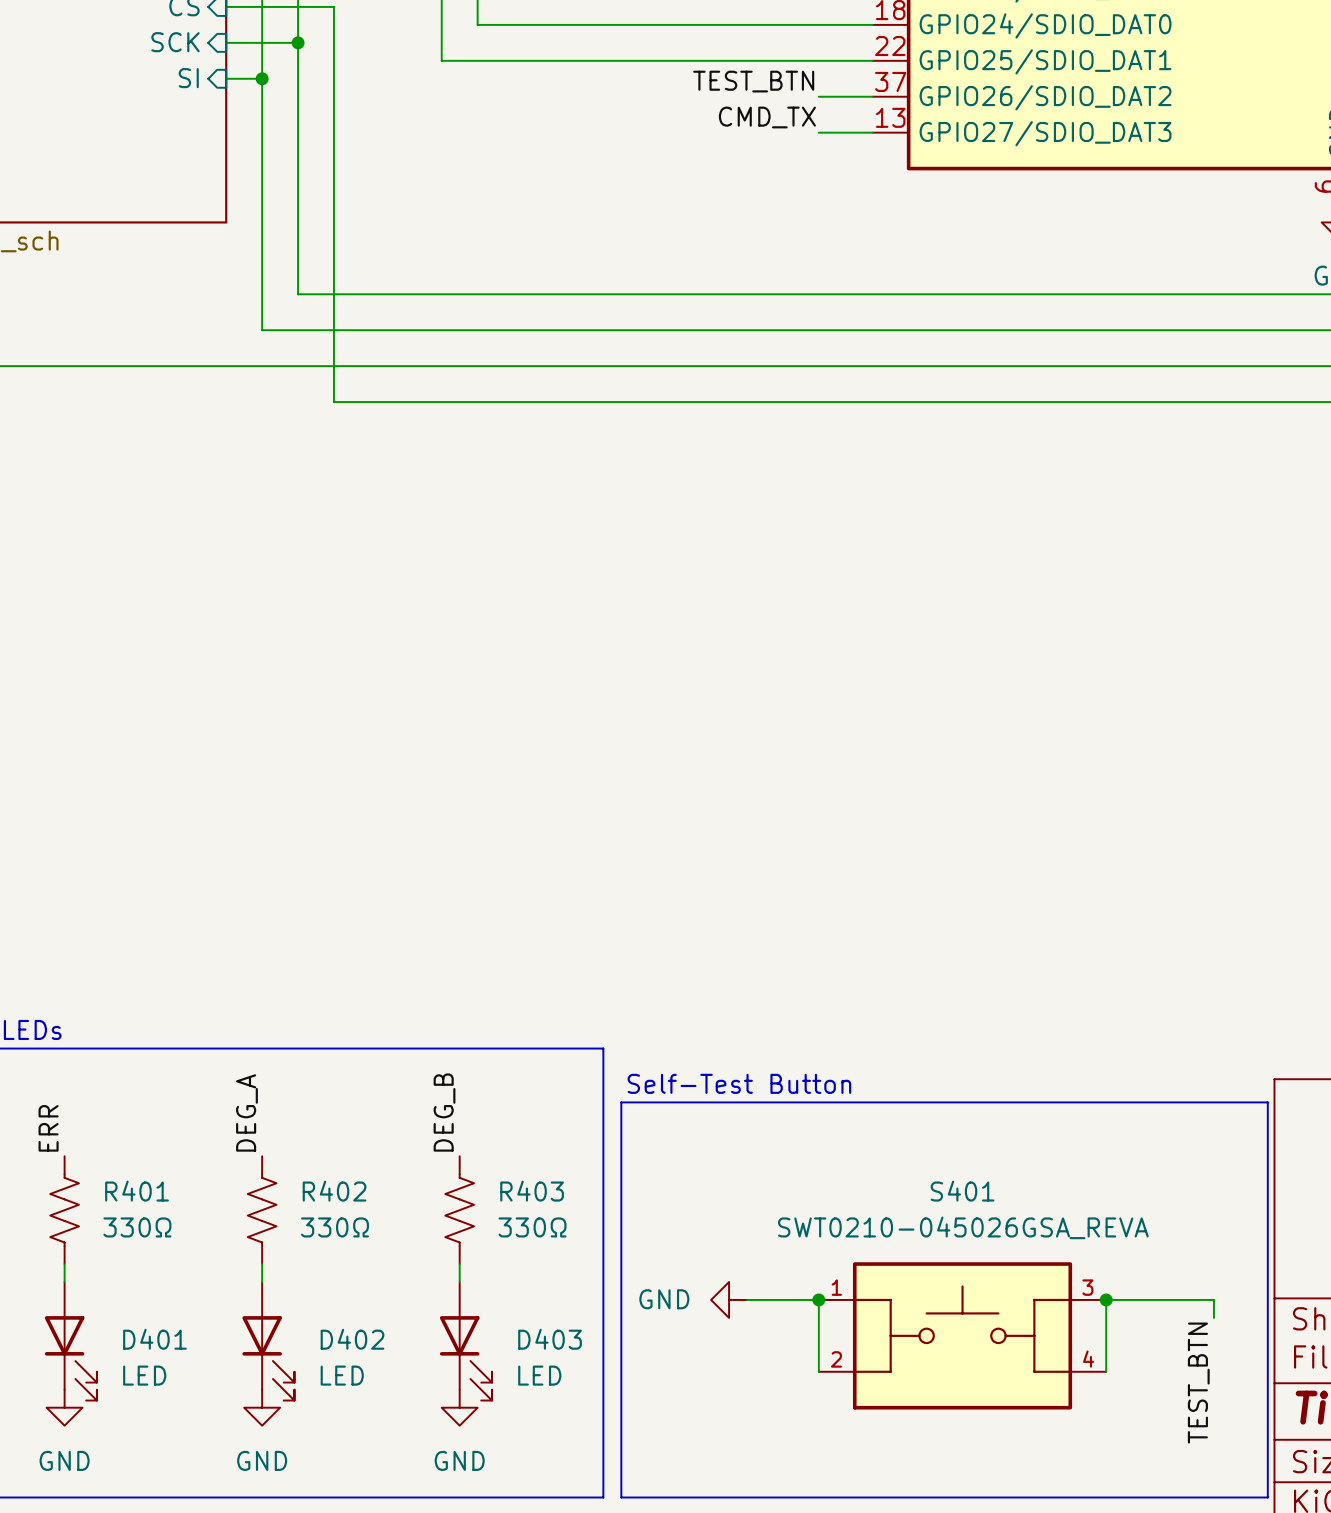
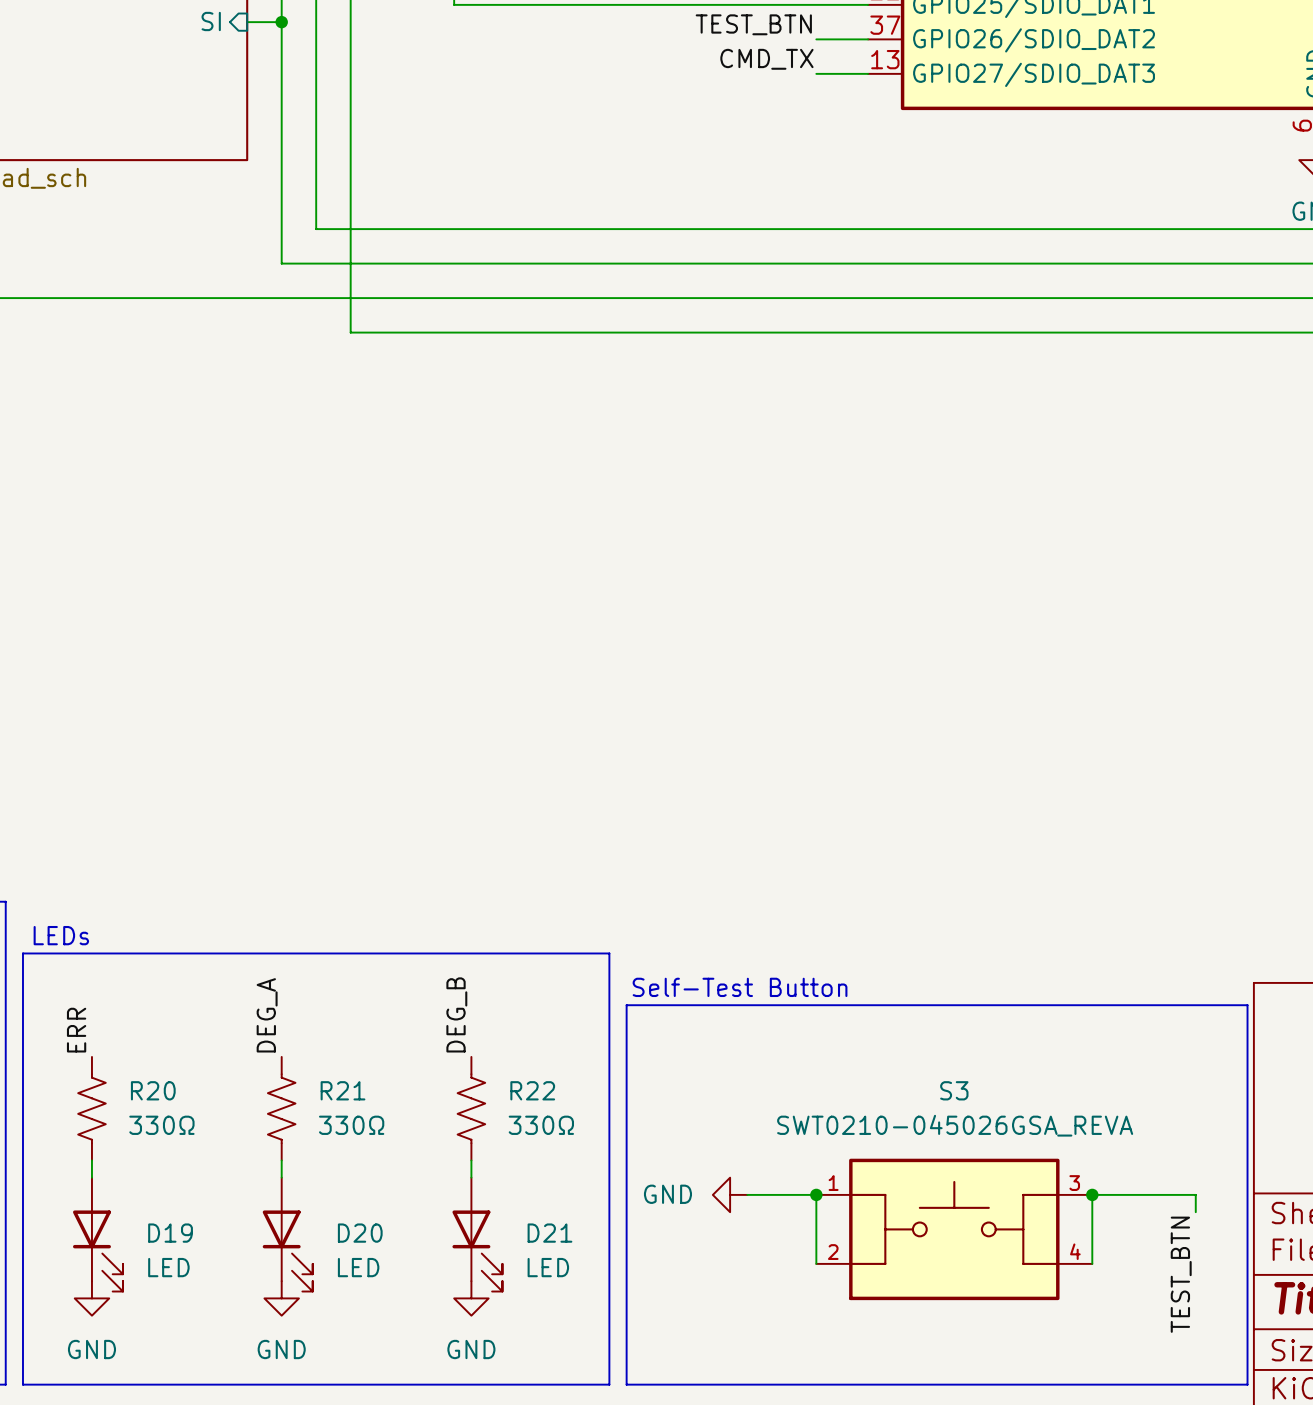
R401 name: R401 (137, 1191) -> R20 (153, 1090)
R402 name: R402 (334, 1191) -> R21 (343, 1090)
R403 name: R403 (532, 1191) -> R22 (532, 1090)
S401 name: S401 (962, 1191) -> S3 (954, 1090)
D401 name: D401 (154, 1339) -> D19 (170, 1233)
D402 name: D402 (352, 1339) -> D20 (360, 1233)
D403 name: D403 (550, 1339) -> D21 (549, 1233)

